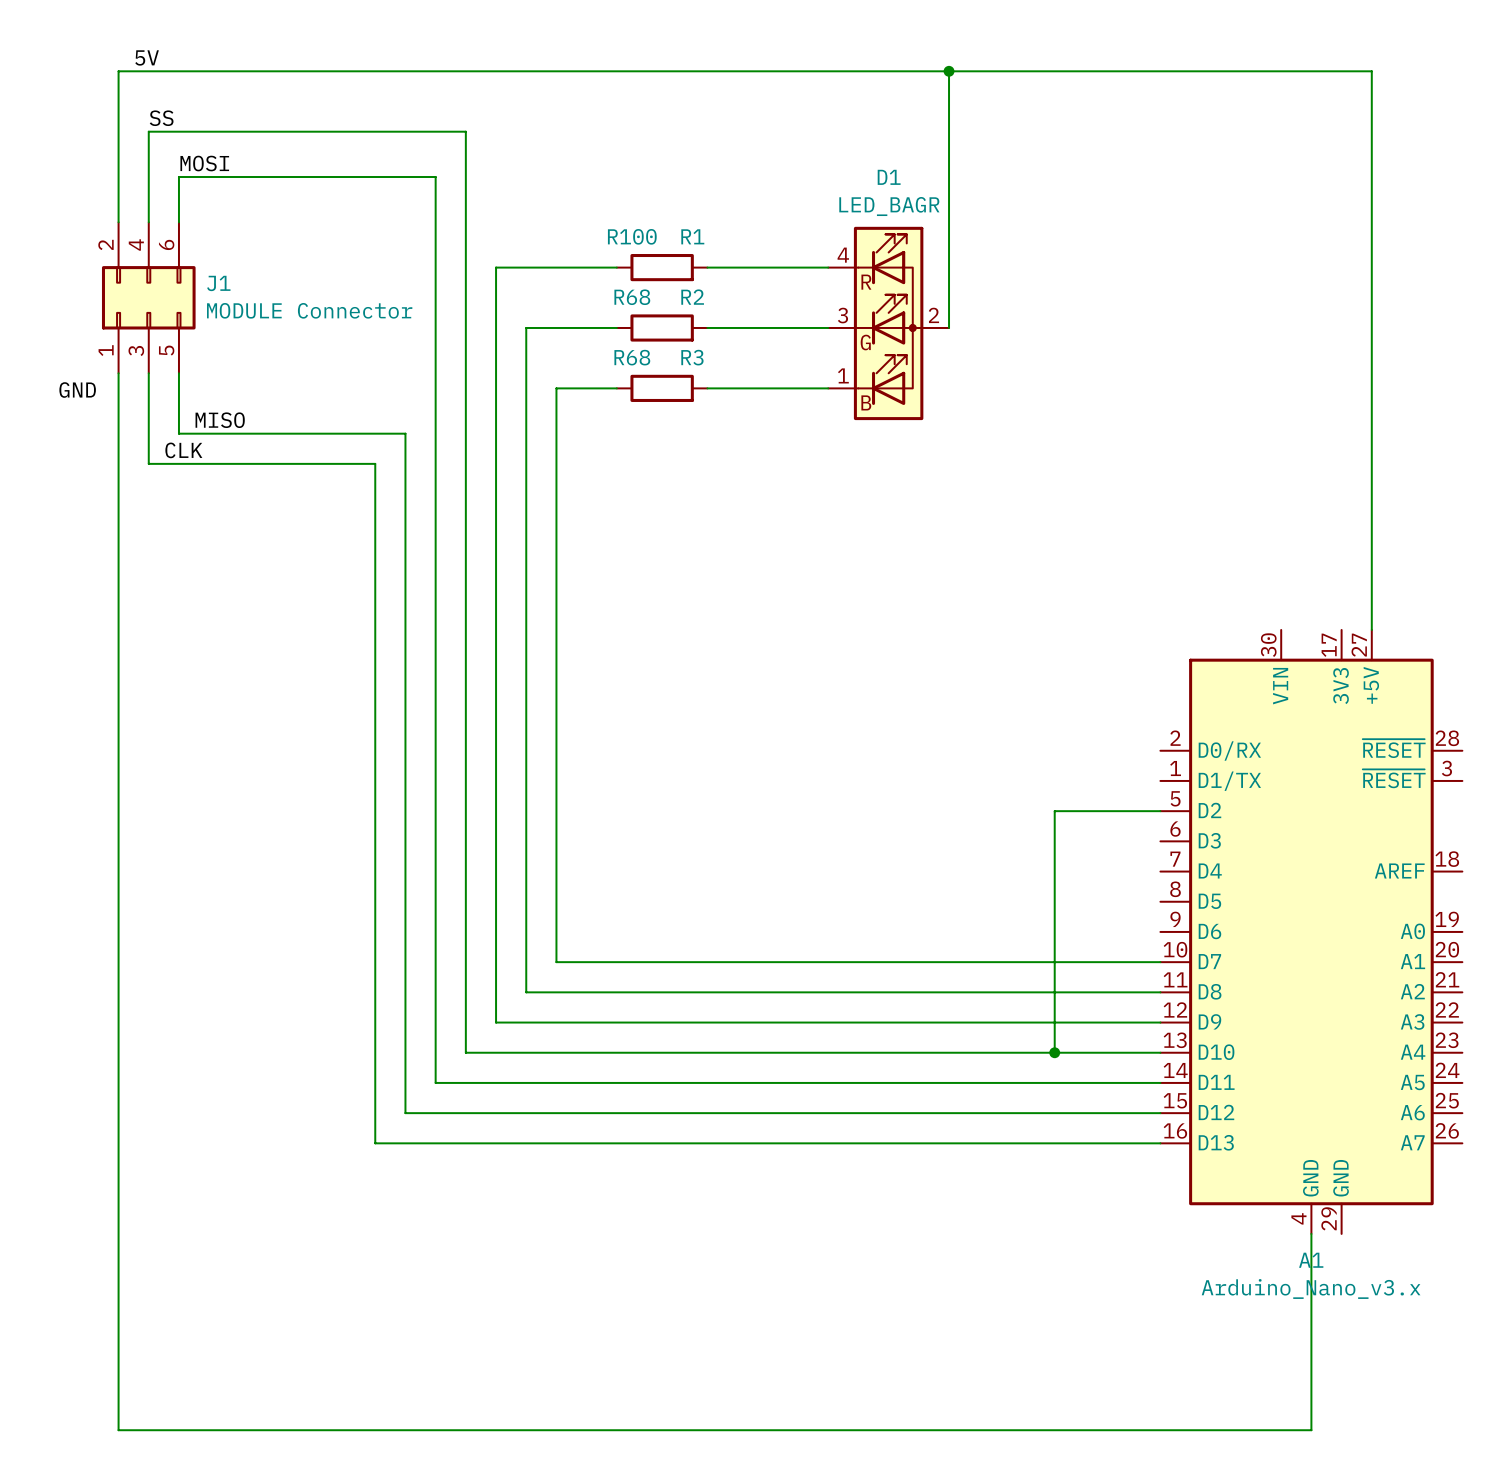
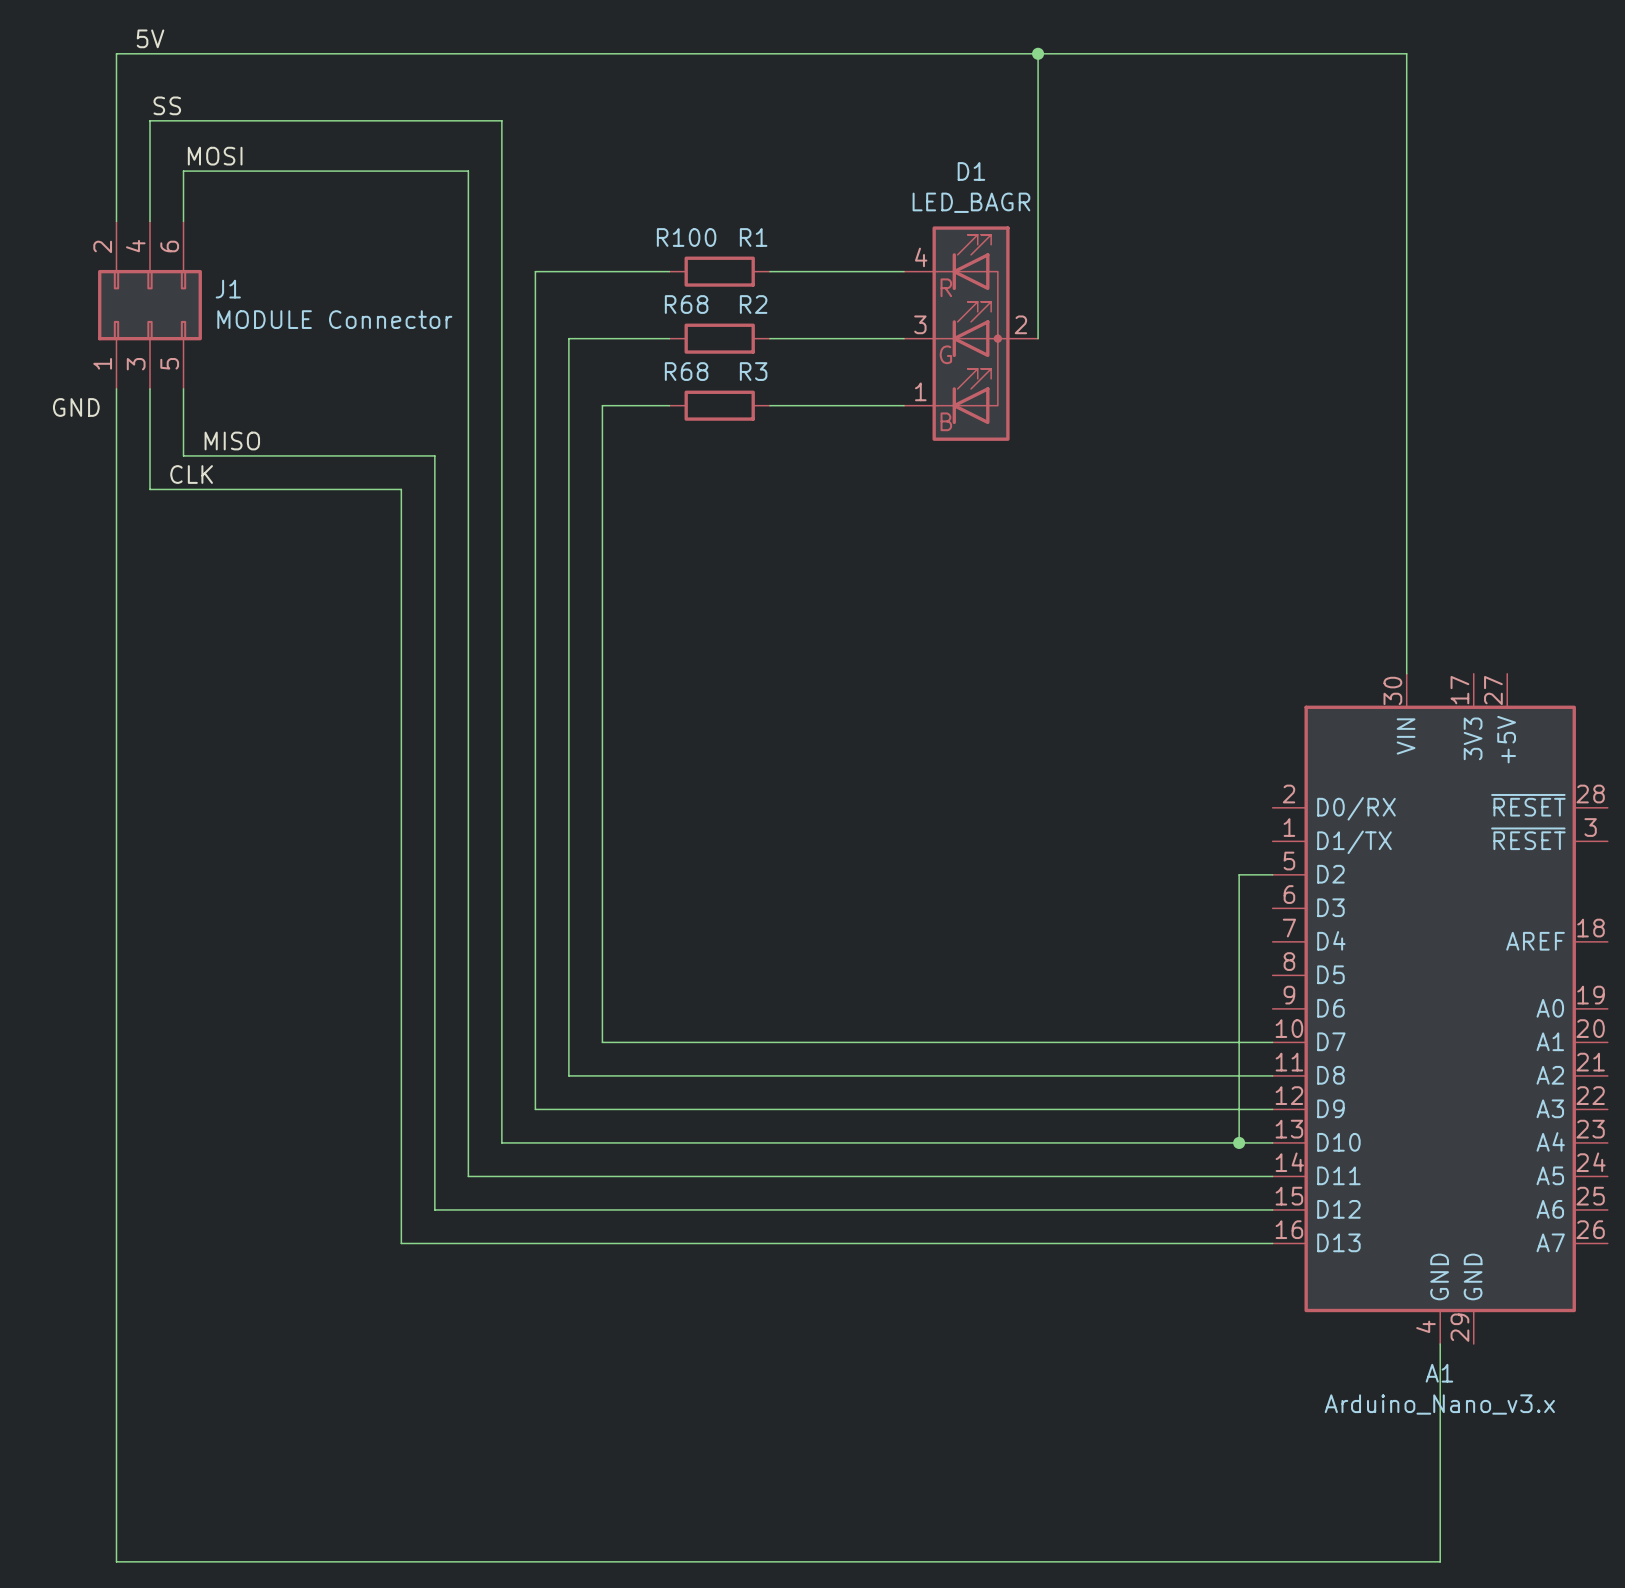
wire: (1281, 71) (1371, 71) (1371, 629) -> (1406, 53) (1406, 673)
wire: (1130, 811) (1054, 811) (1054, 1052) -> (1239, 874) (1239, 1142)
junction: (1054, 1052) -> none
junction: none -> (1239, 1142)

